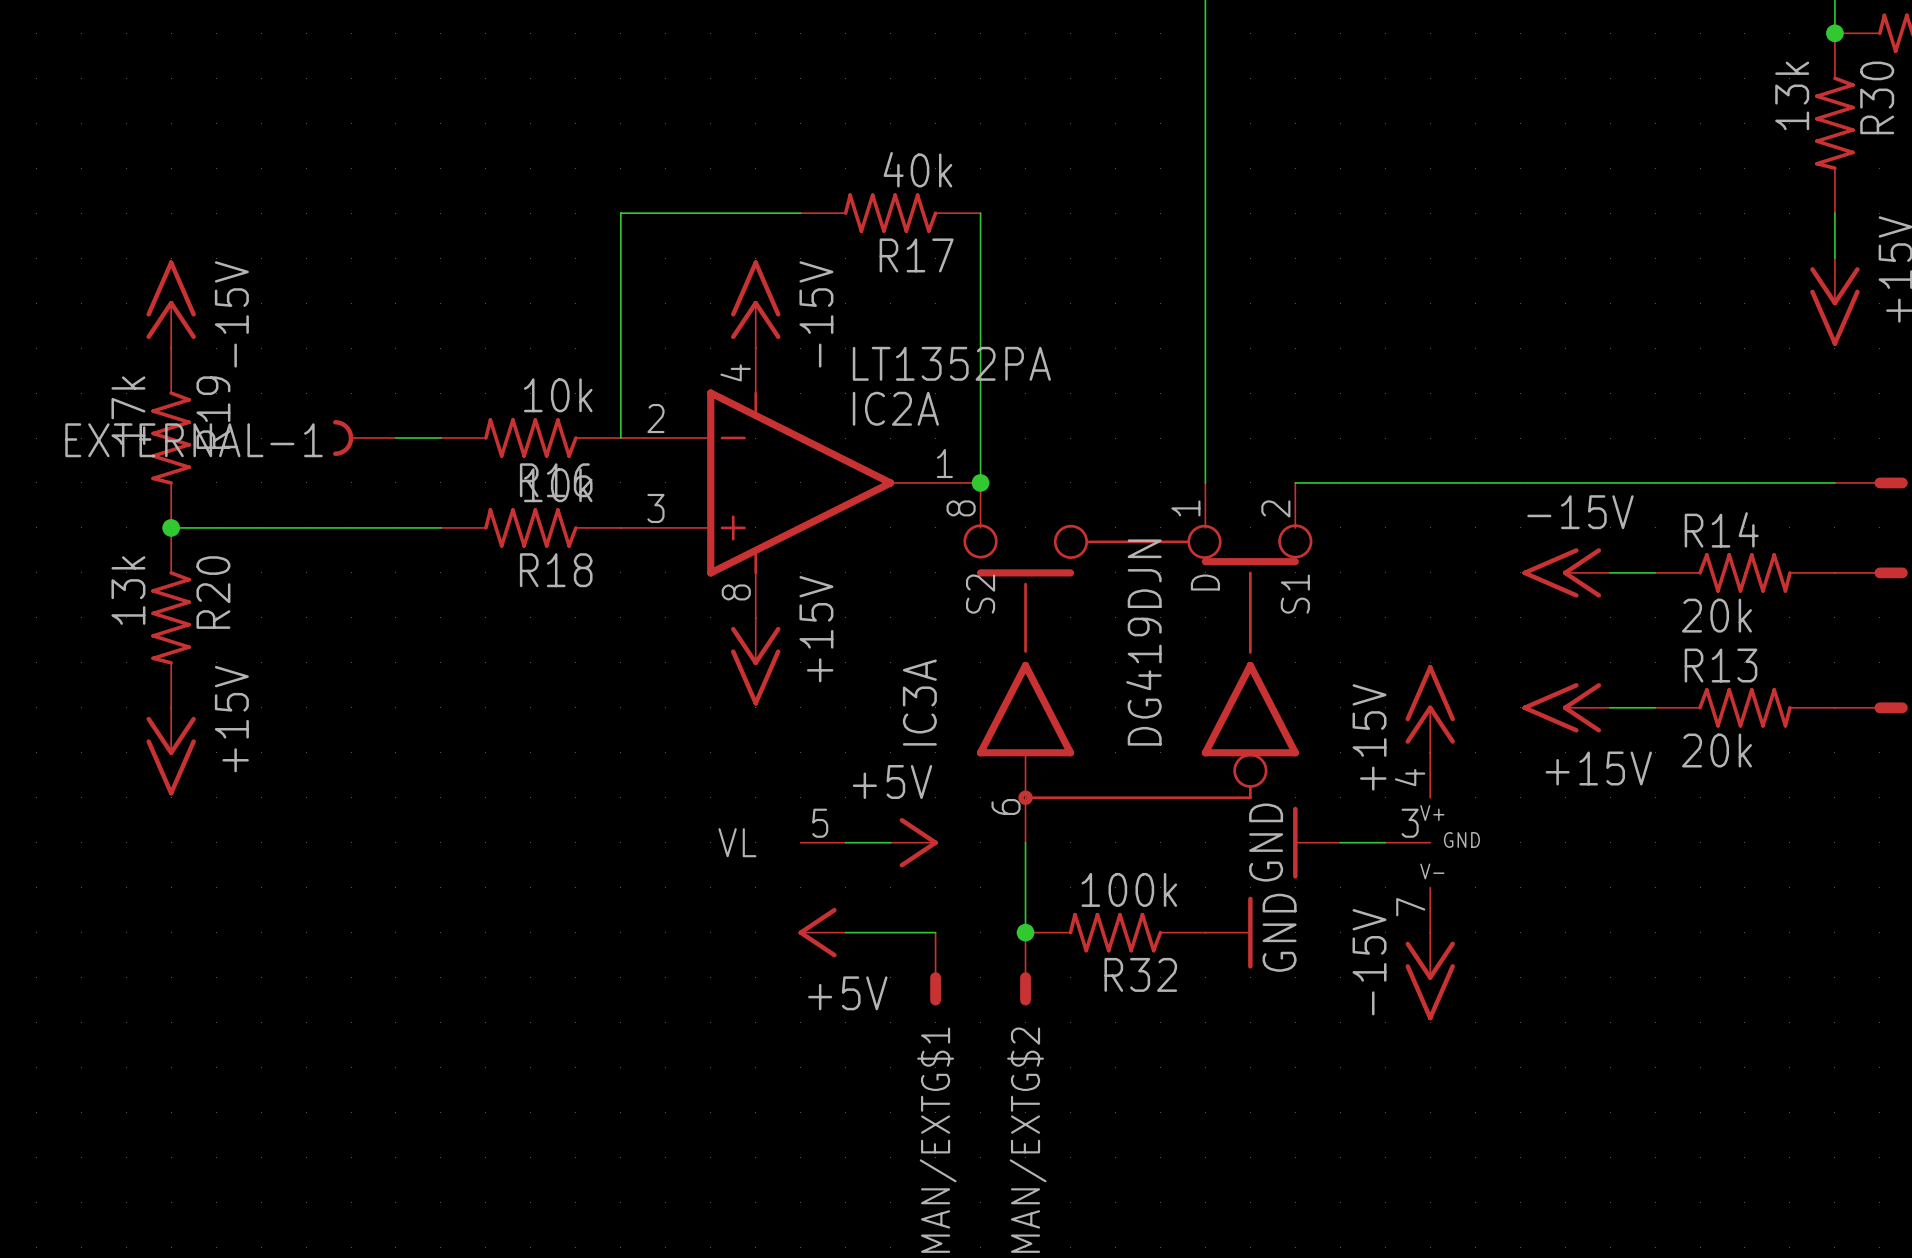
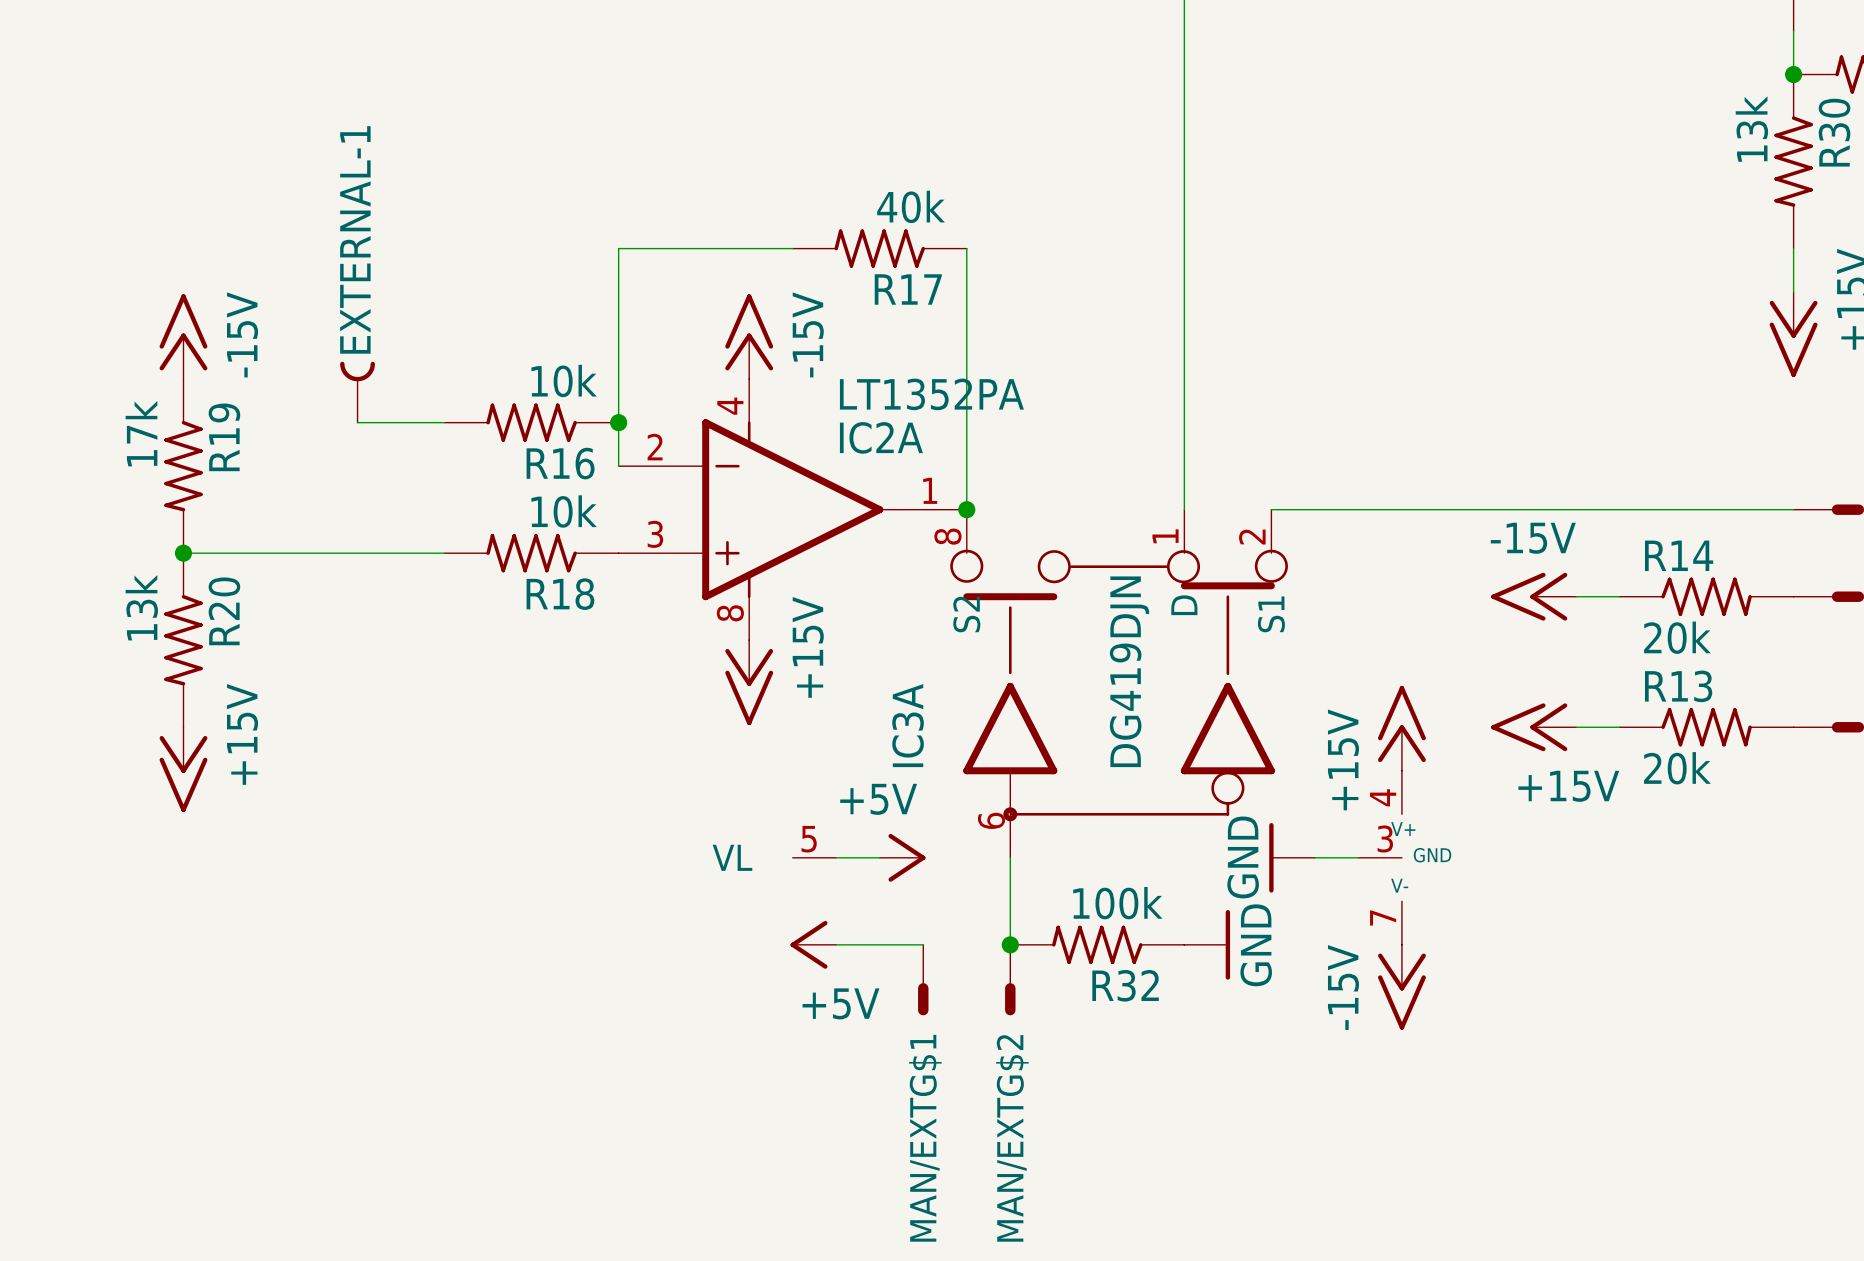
wire: none -> (357, 422) (444, 422)
junction: none -> (618, 422)
EXTERNAL-1 rotation: 0° (343, 438) -> 90° clockwise (357, 371)
EXTERNAL-1 position: (364, 438) -> (357, 392)
wire: (395, 438) (440, 438) -> none
R16 position: (530, 438) -> (531, 422)

